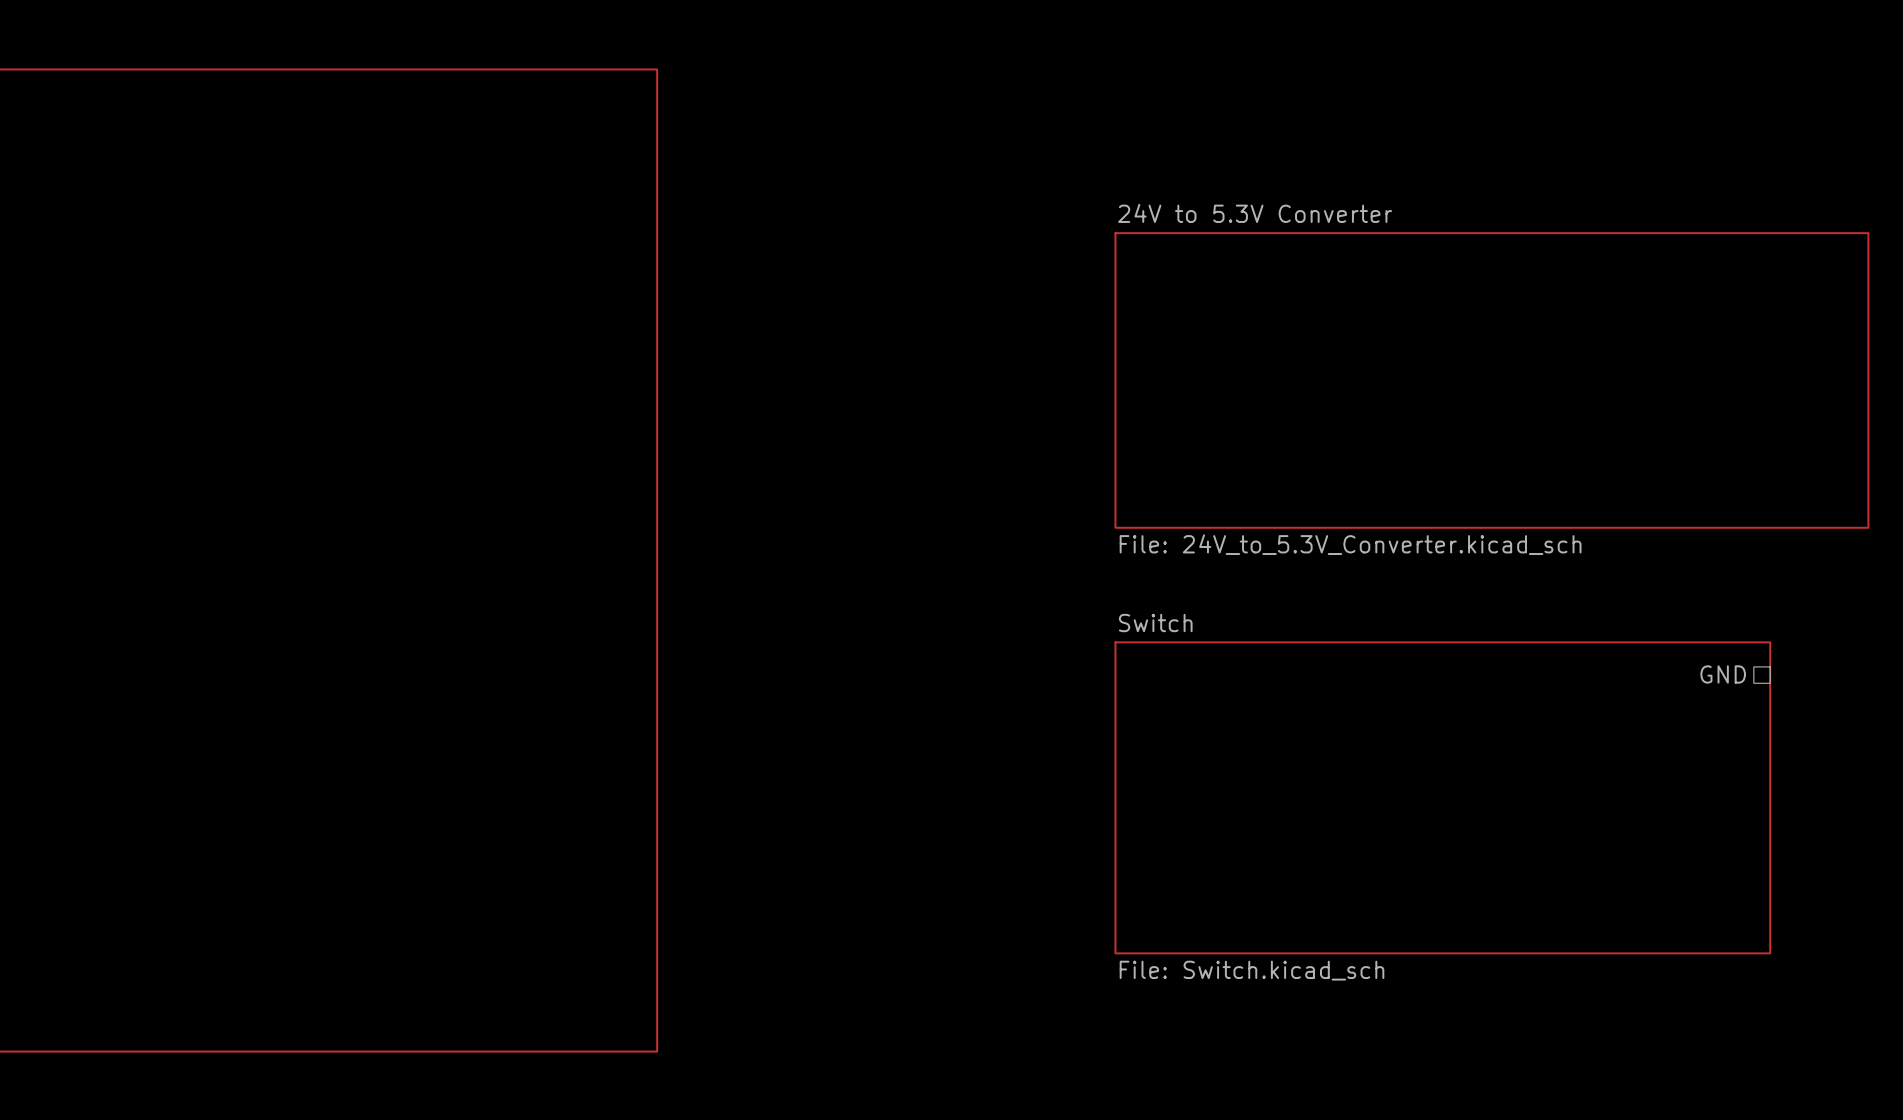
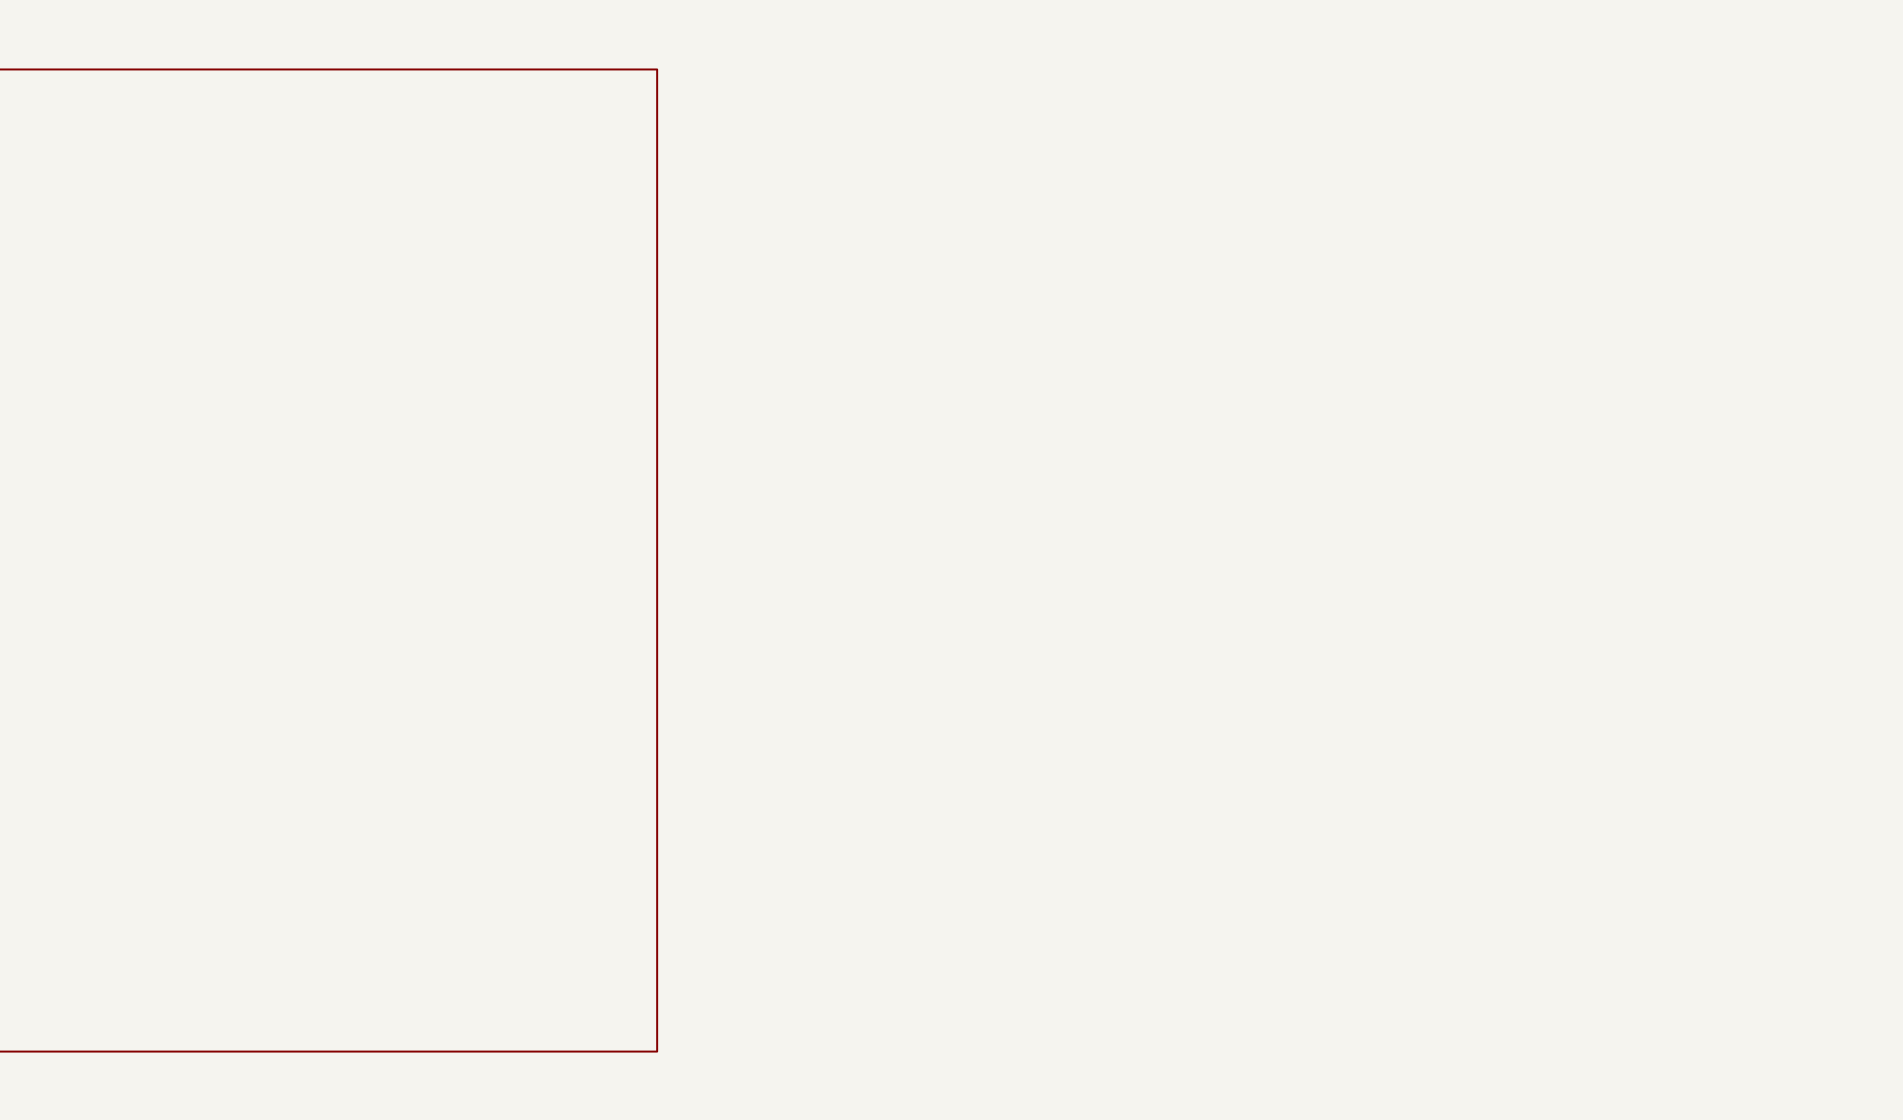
sheet 24V to 5.3V Converter: File: 24V_to_5.3V_Converter.kicad_sch (1491, 380) -> none
sheet pin: GND (1723, 674) -> none
sheet Switch: File: Switch.kicad_sch (1442, 797) -> none

